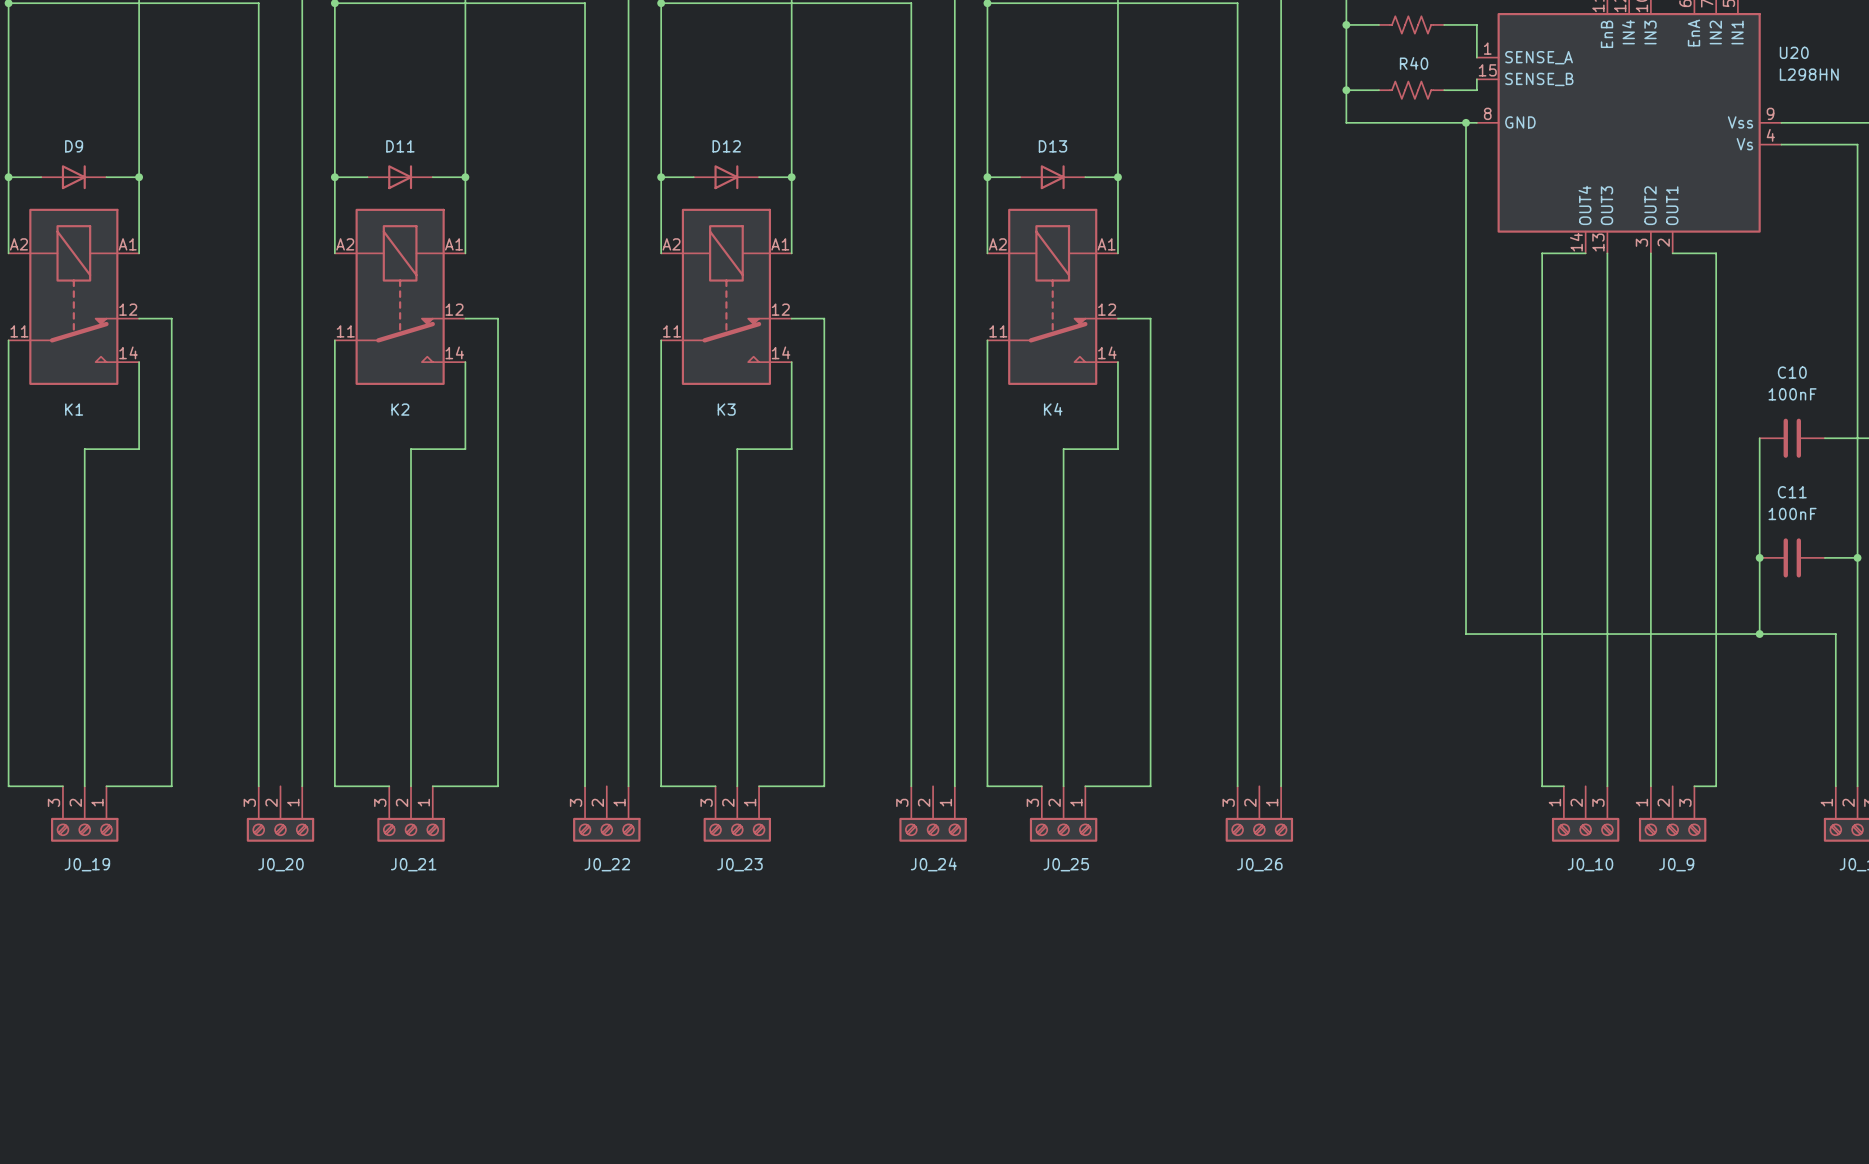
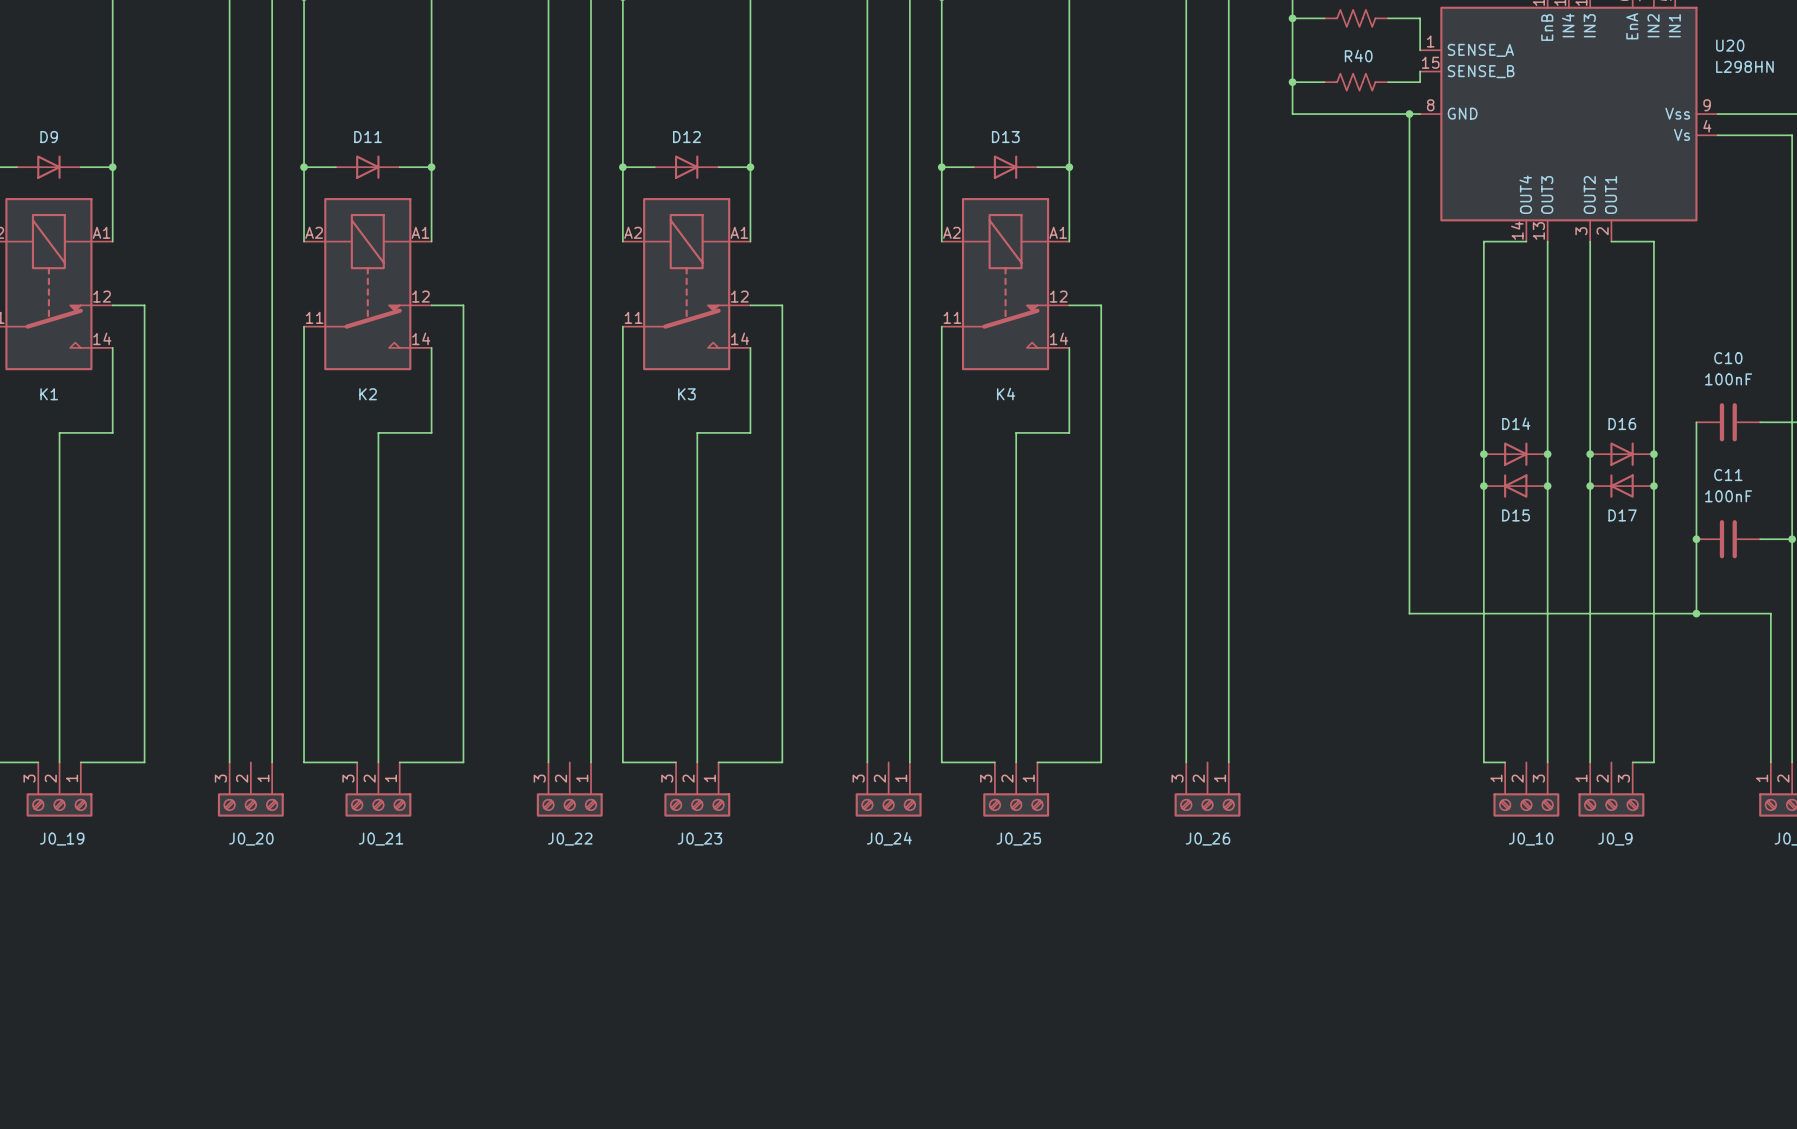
junction: none -> (1483, 454)
D14: none -> (1515, 454)
junction: none -> (1547, 454)
junction: none -> (1590, 454)
D16: none -> (1622, 454)
junction: none -> (1653, 454)
junction: none -> (1483, 486)
D15: none -> (1515, 486)
junction: none -> (1547, 486)
junction: none -> (1590, 486)
D17: none -> (1622, 486)
junction: none -> (1653, 486)

